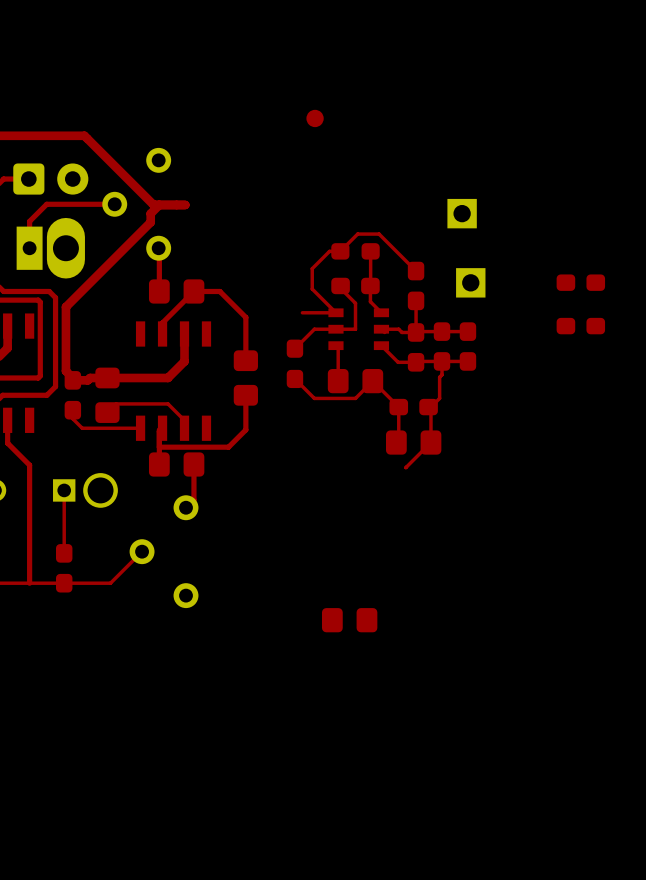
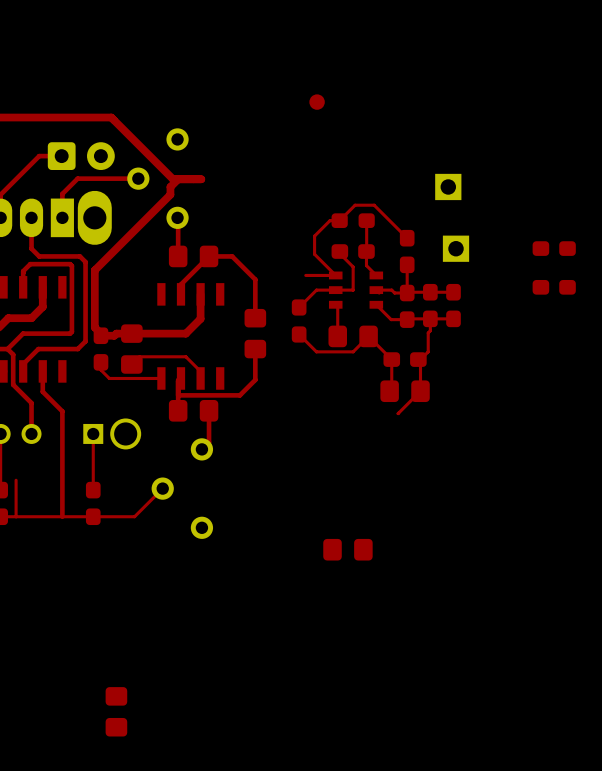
part: none -> (116, 711)

